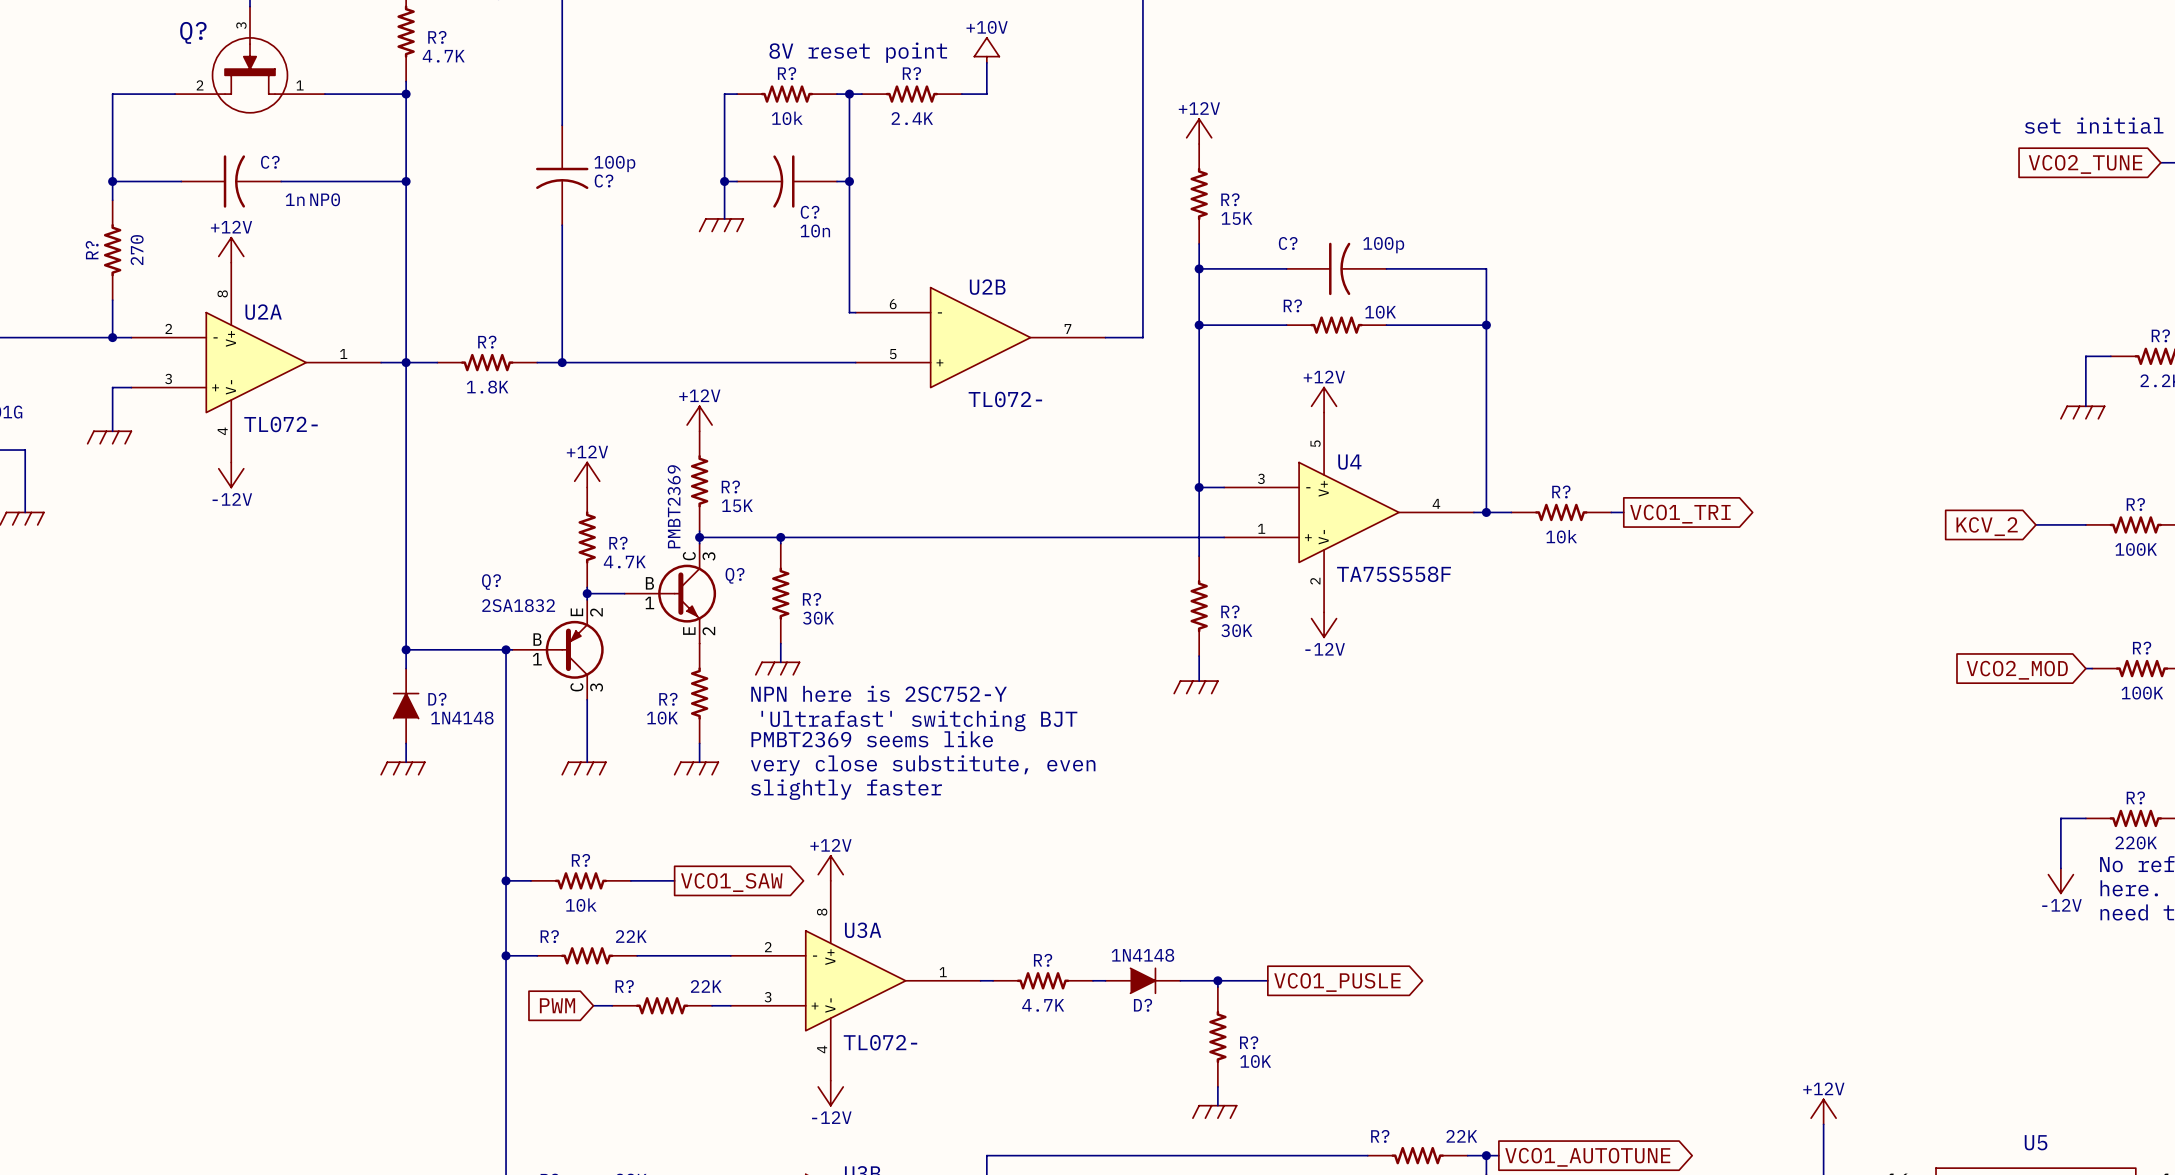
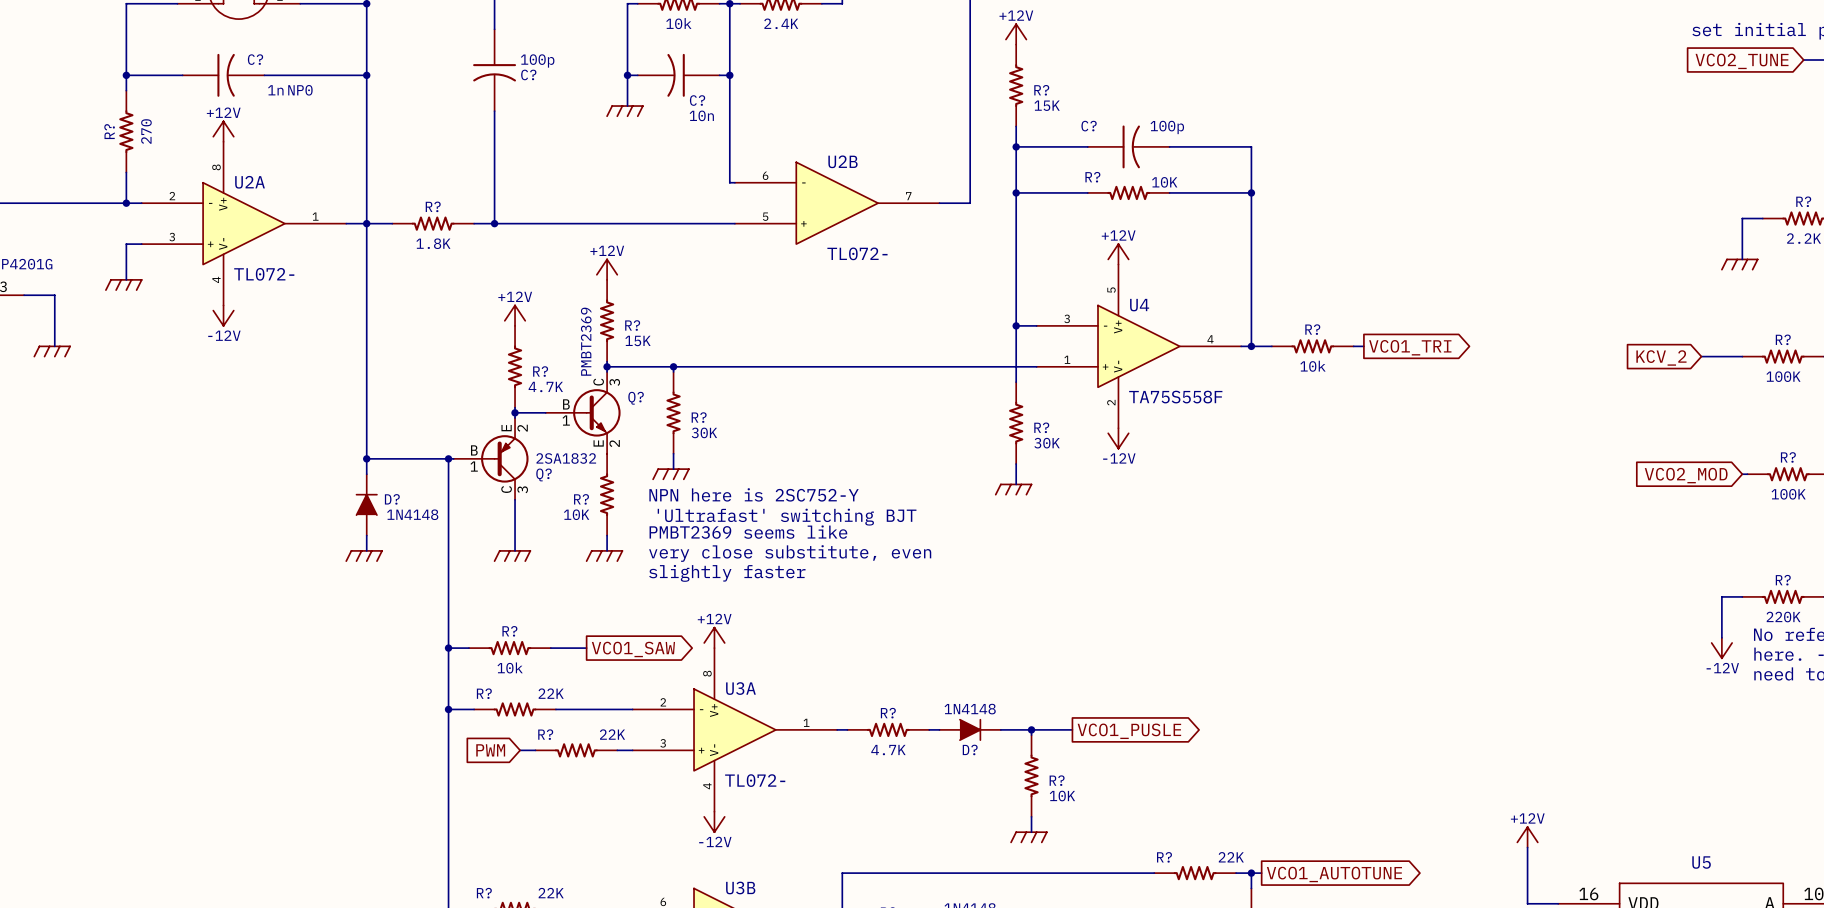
Q? name position: Q? (491, 582) -> Q? (544, 474)
Q? value position: 2SA1832 (518, 605) -> 2SA1832 (566, 458)

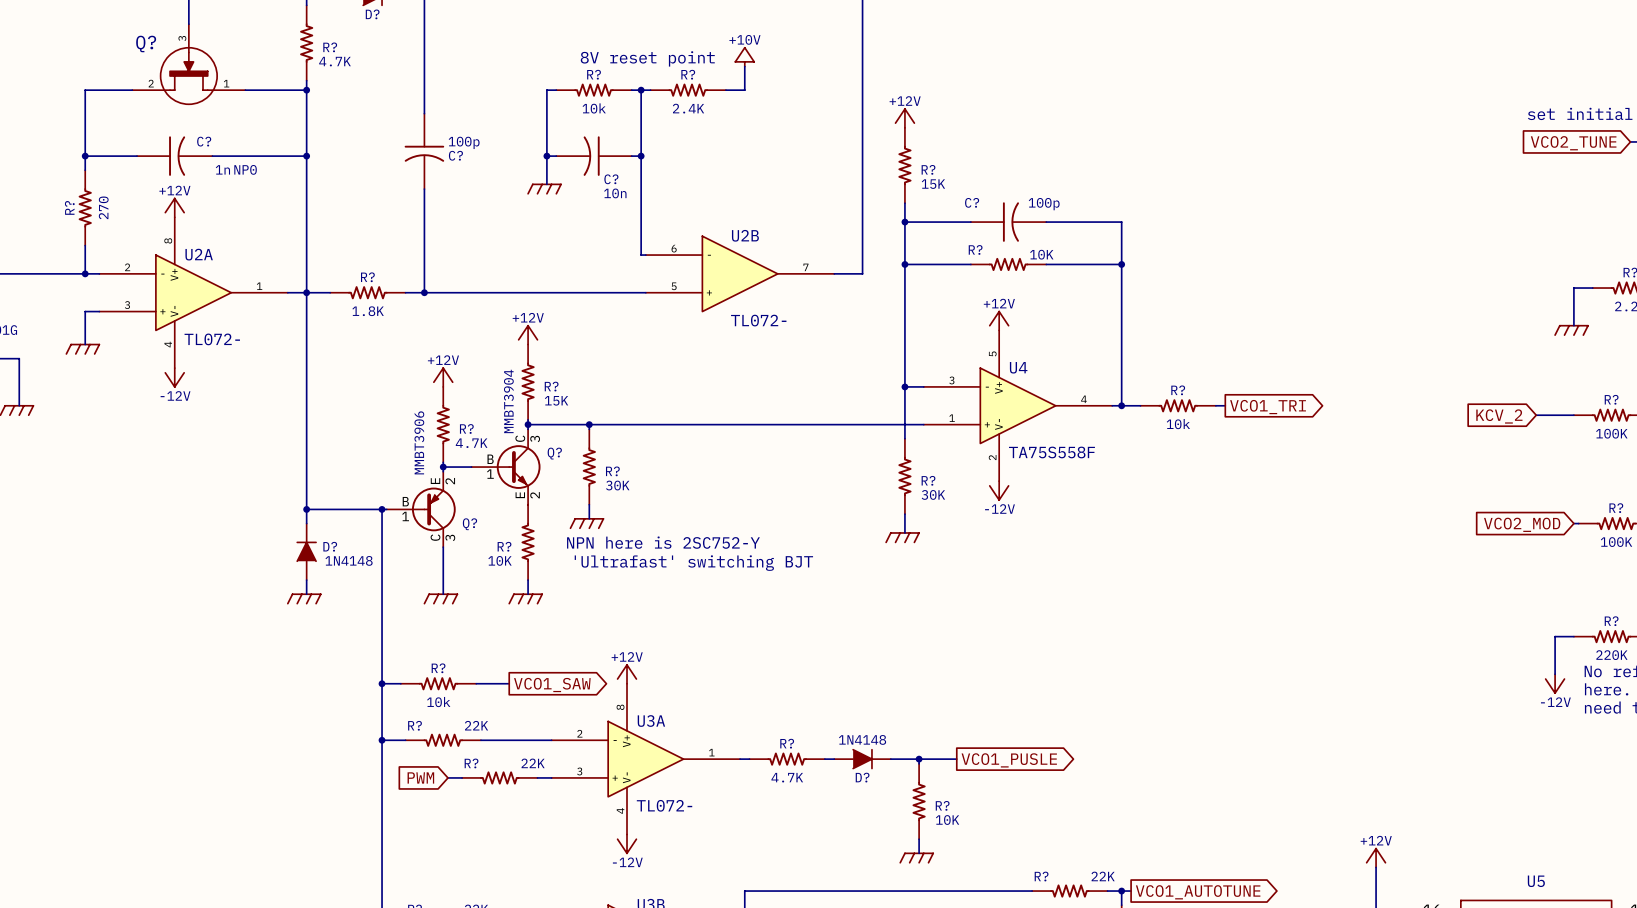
Q? value: PMBT2369 (586, 341) -> MMBT3904 (508, 401)
Q? value: 2SA1832 (566, 458) -> MMBT3906 (419, 442)
text: PMBT2369 seems like (748, 532) -> none
text: very close substitute, even (790, 553) -> none
text: slightly faster (727, 573) -> none

